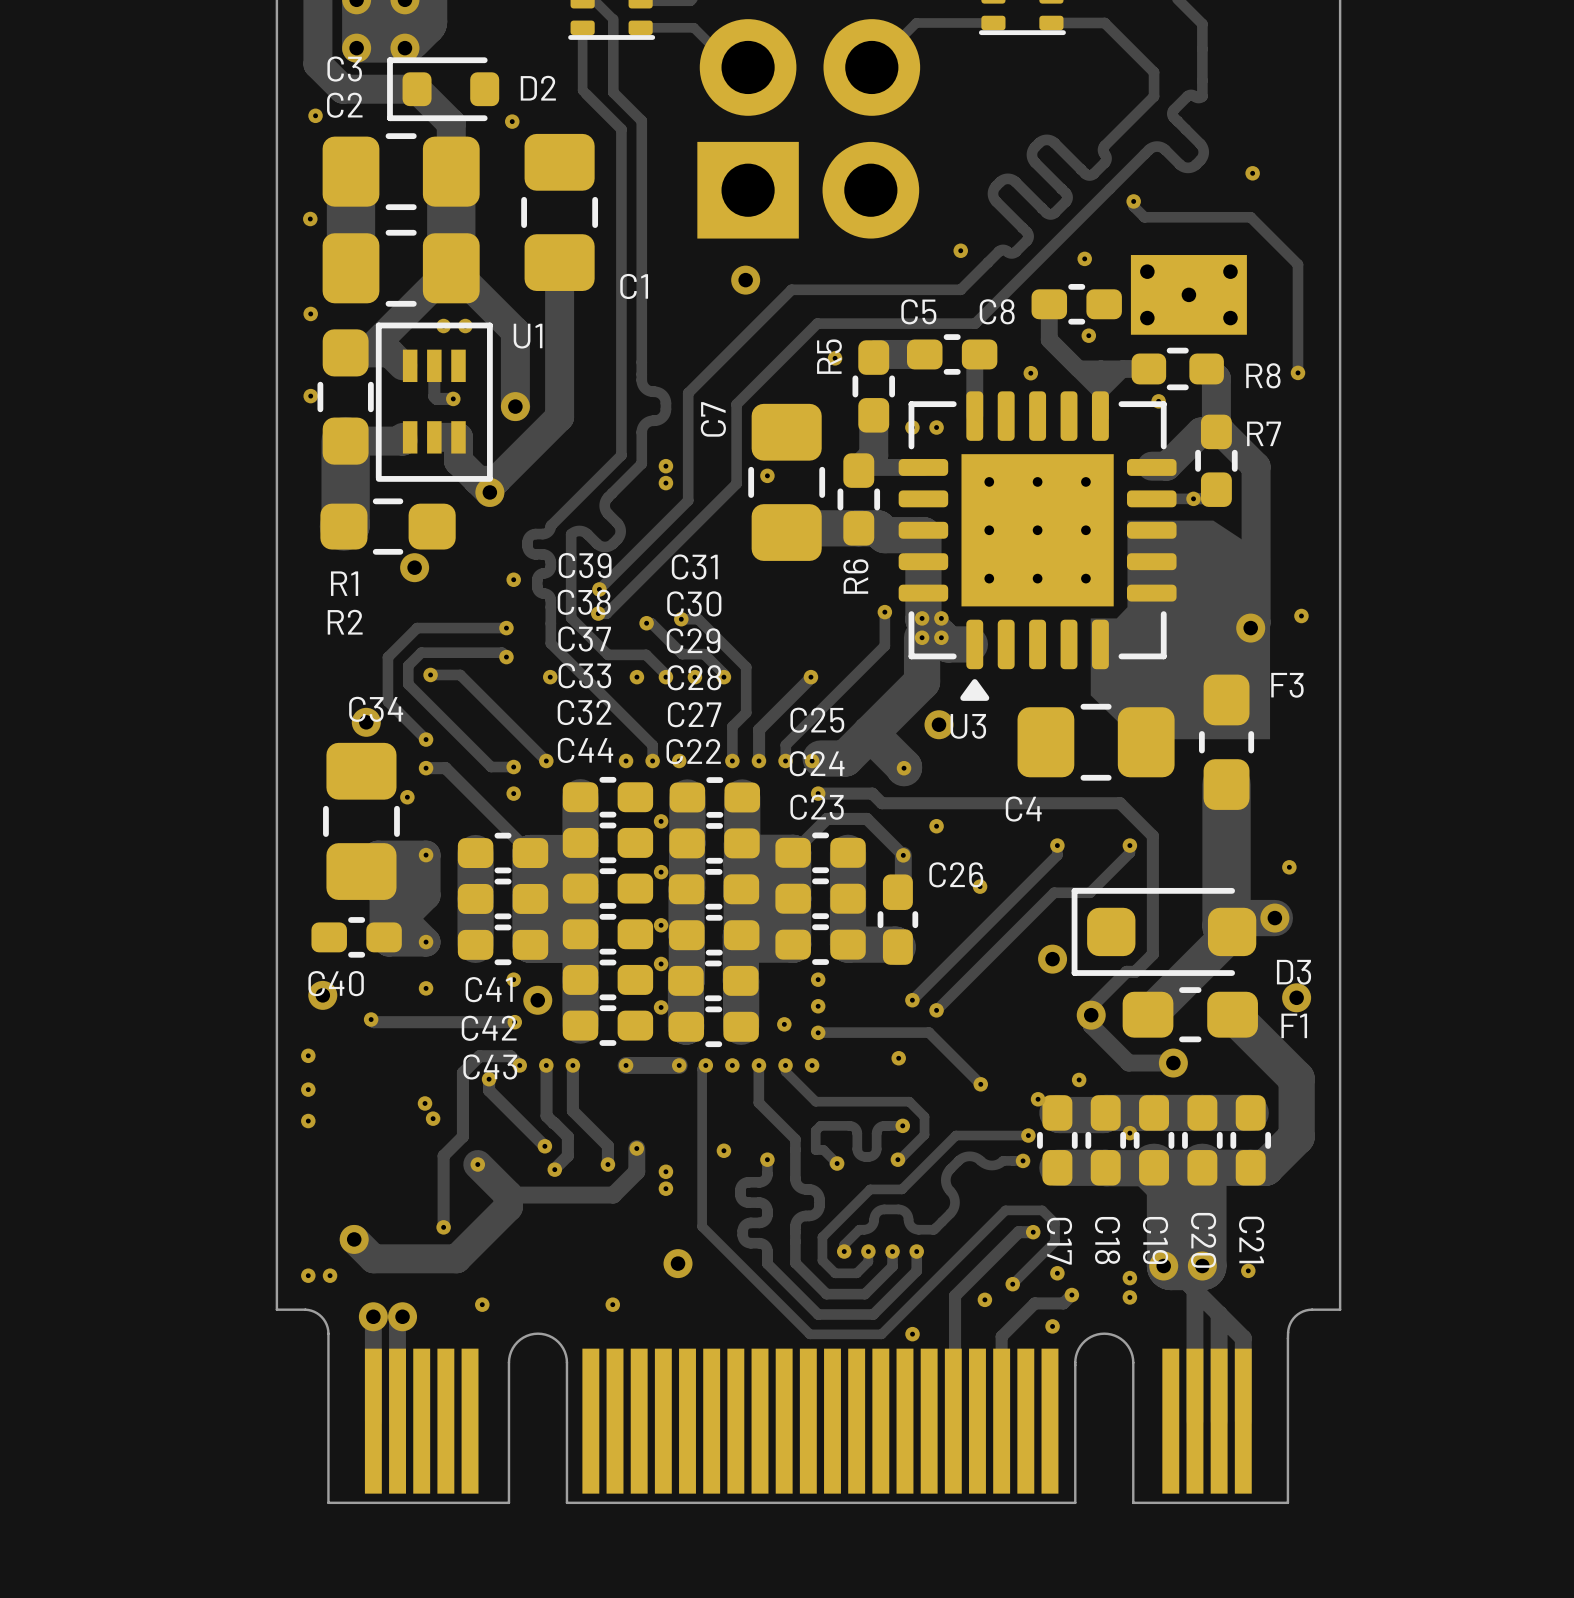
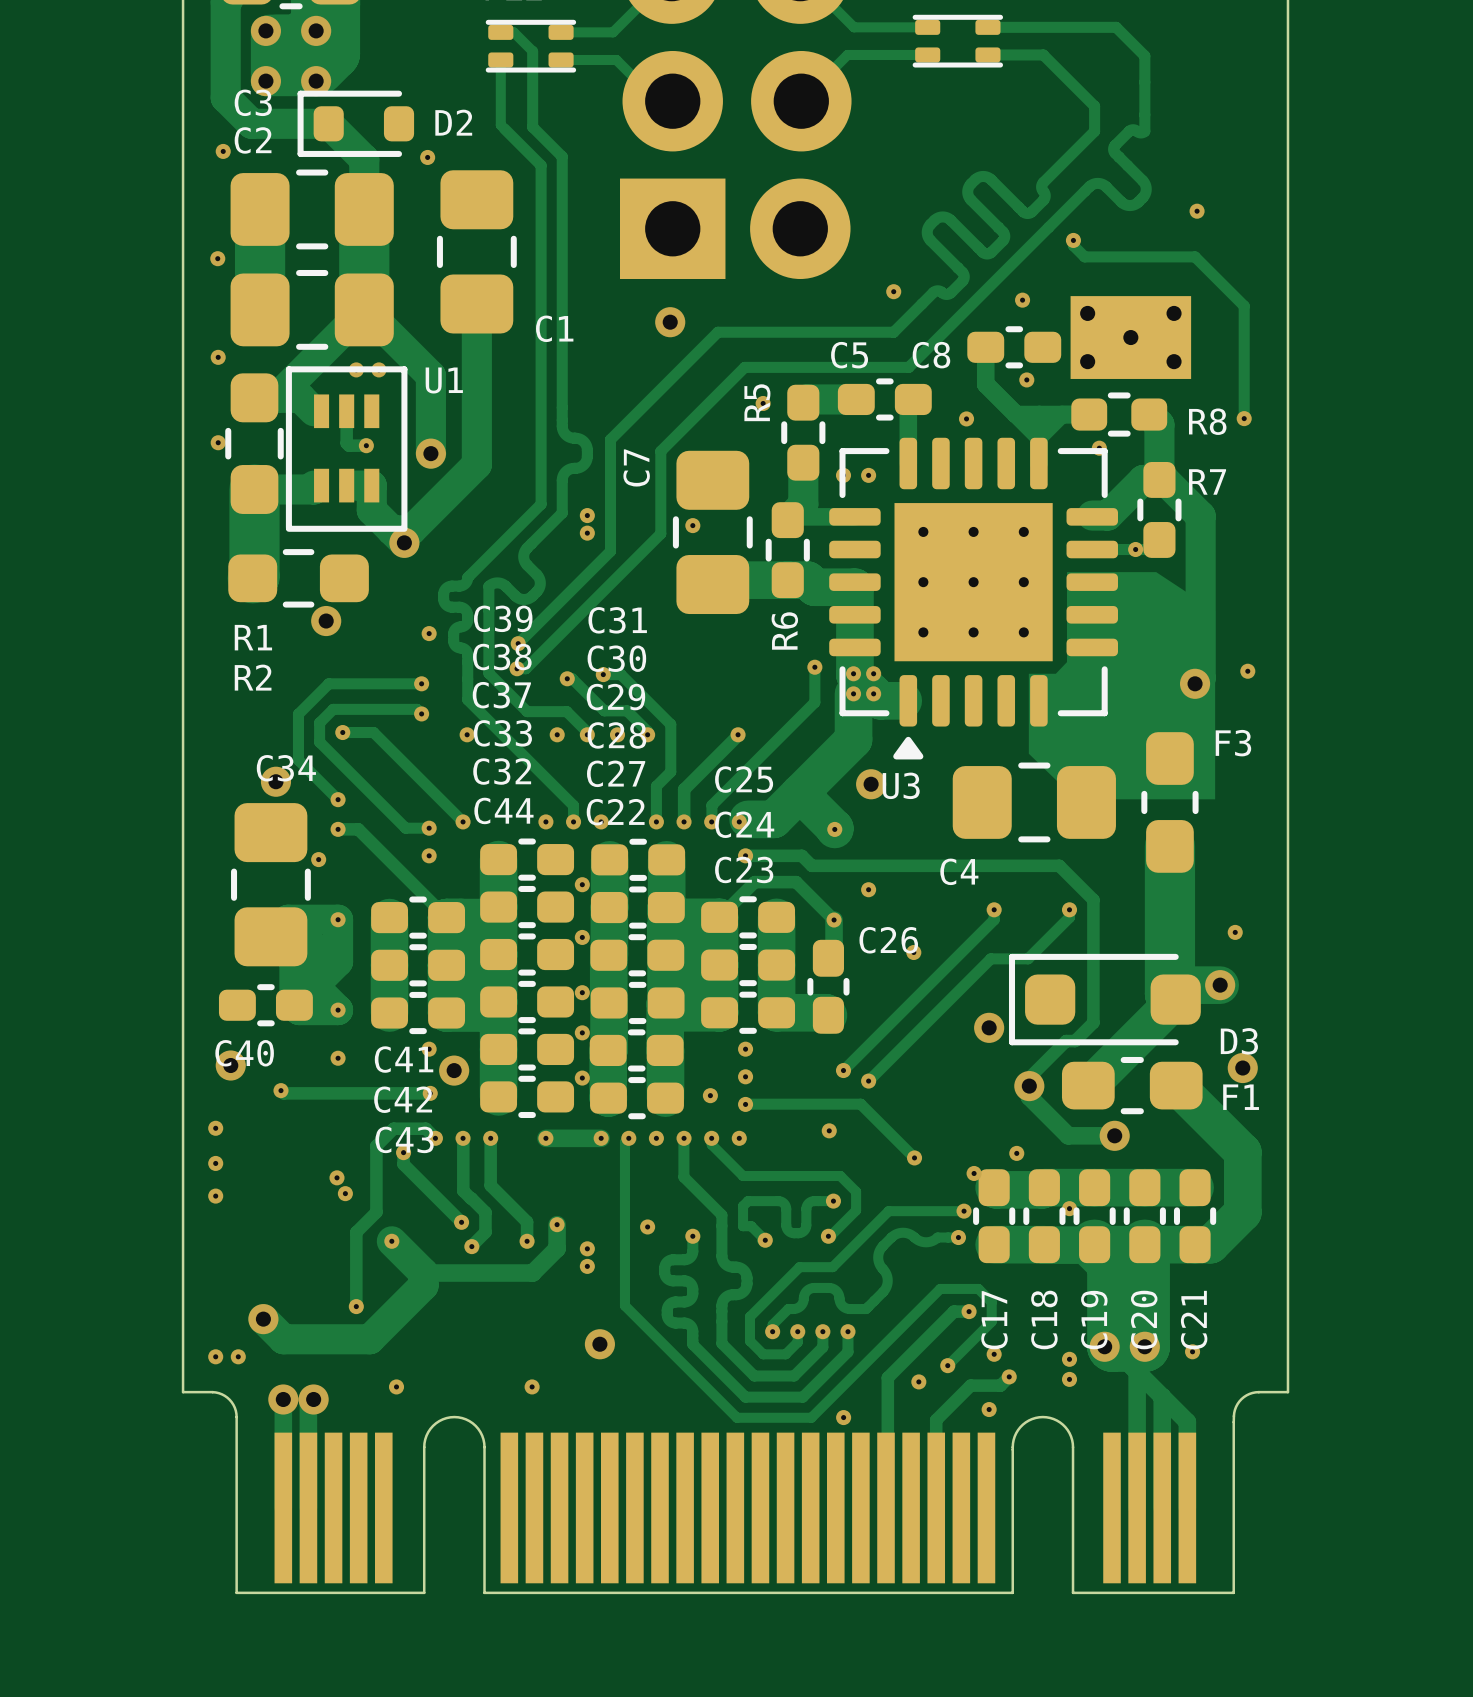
C21 name rotation: 0° (1251, 1239) -> 180° (1194, 1320)
C18 name rotation: 0° (1107, 1240) -> 180° (1044, 1320)
C19 name rotation: 0° (1155, 1240) -> 180° (1094, 1320)
C20 name rotation: 0° (1203, 1240) -> 180° (1144, 1320)
C17 name rotation: 0° (1059, 1241) -> 180° (994, 1320)

